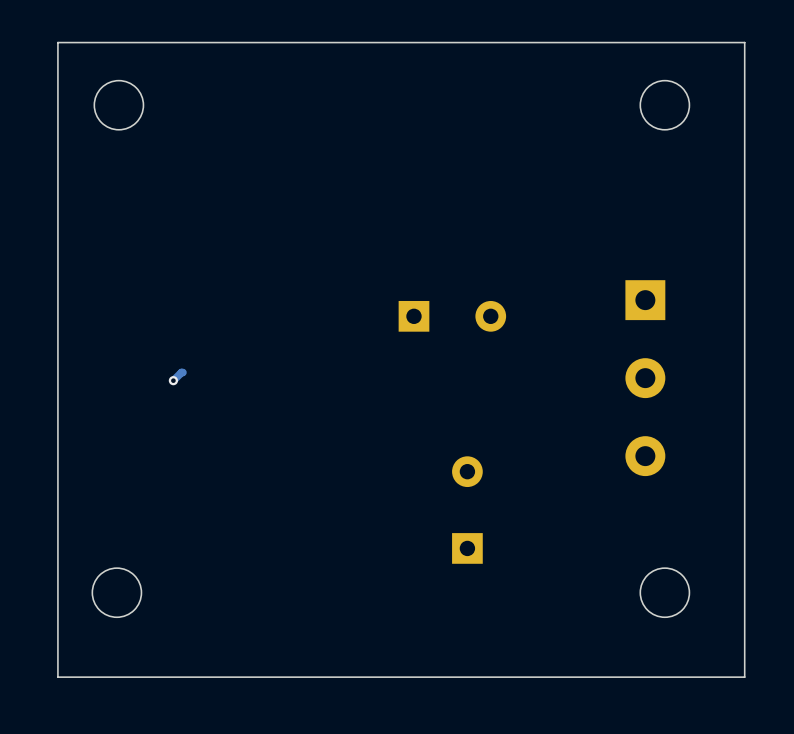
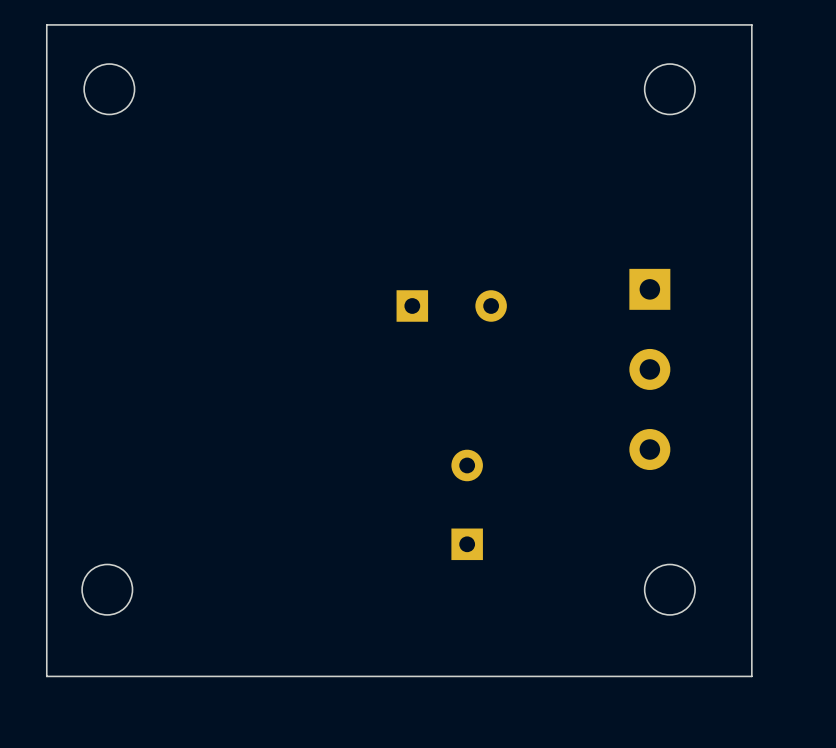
track: (182, 372) (173, 380) -> none
via: (173, 380) -> none

